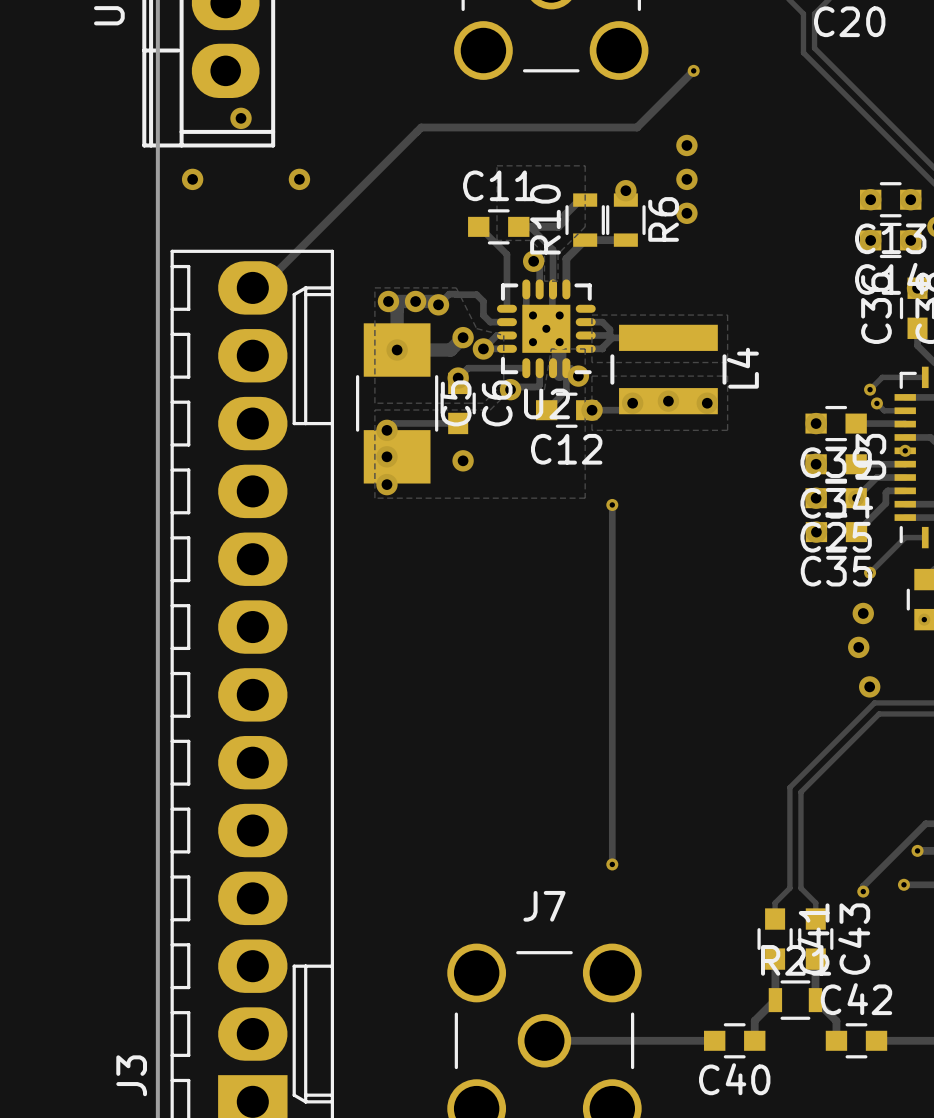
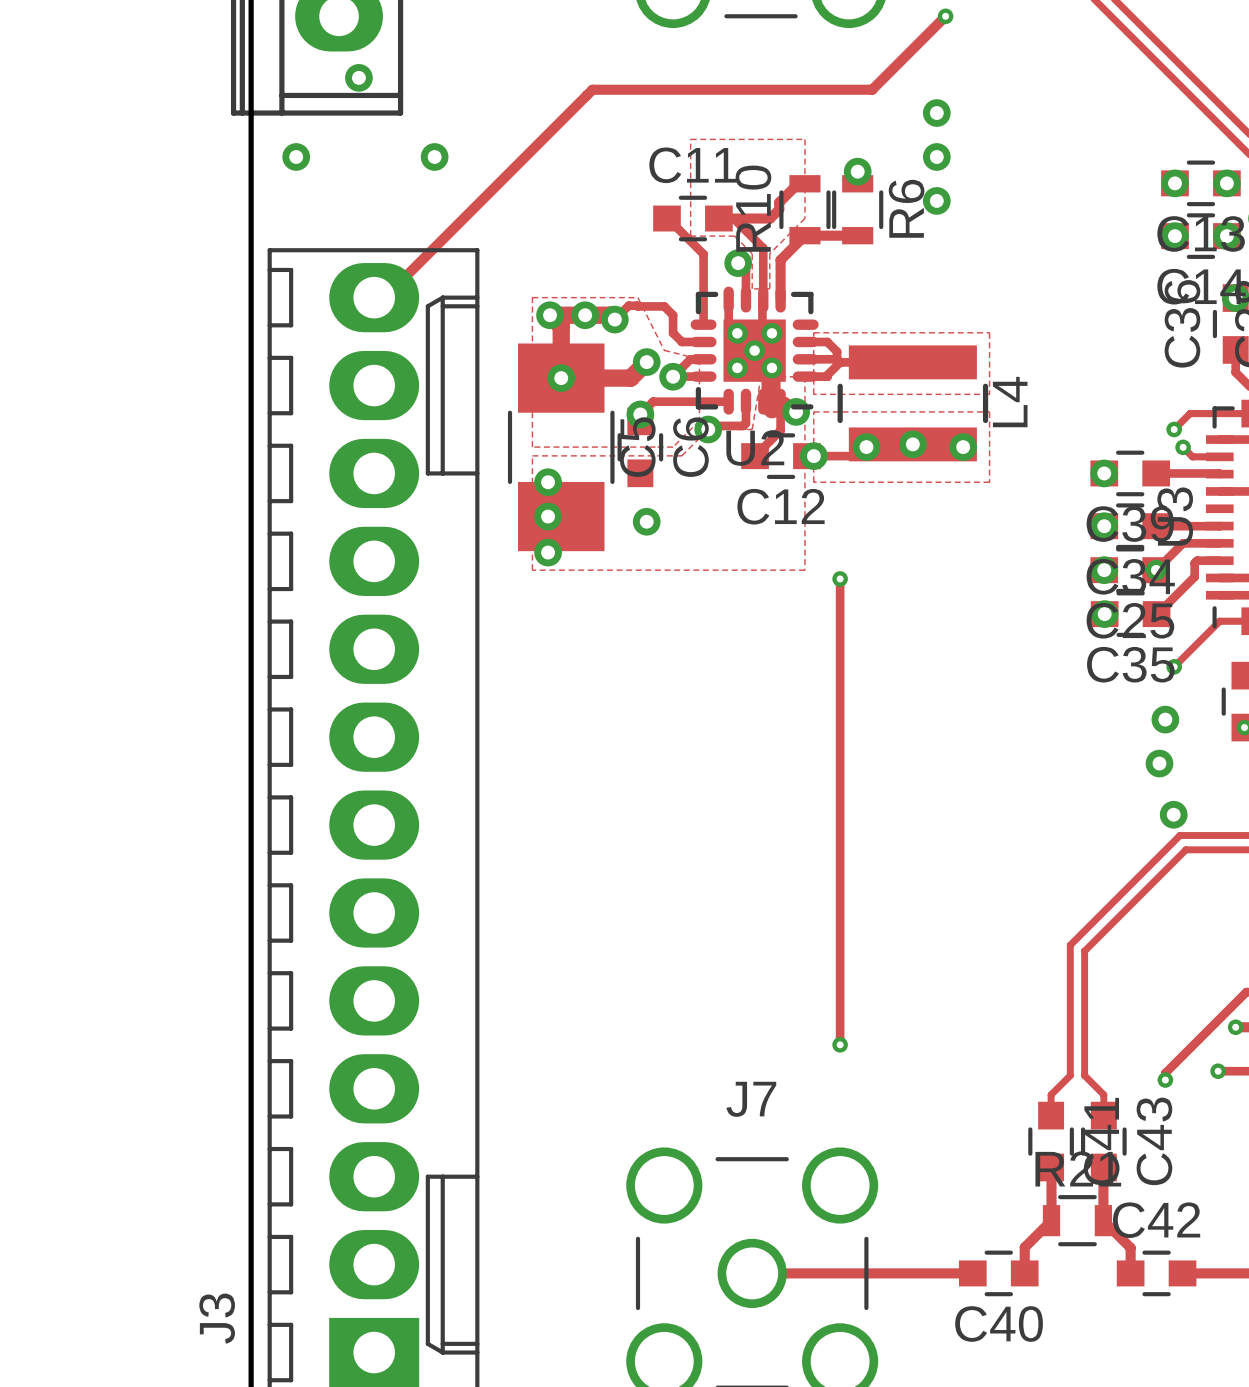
track: (458, 423) (393, 423) (386, 430) -> none
via: (905, 450) -> none

